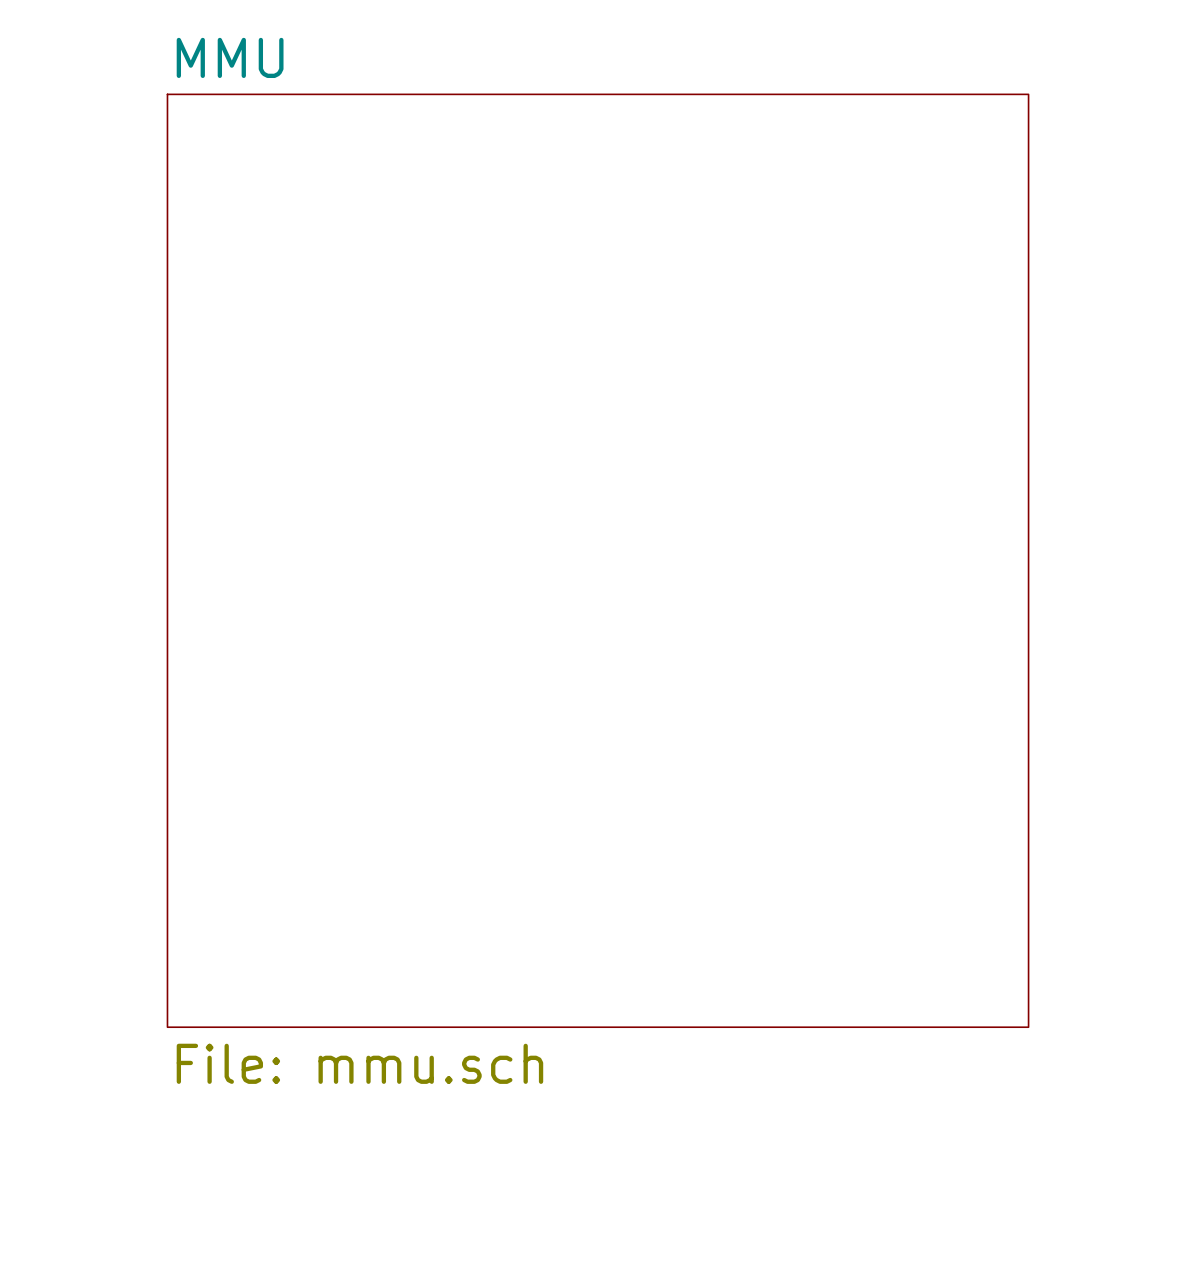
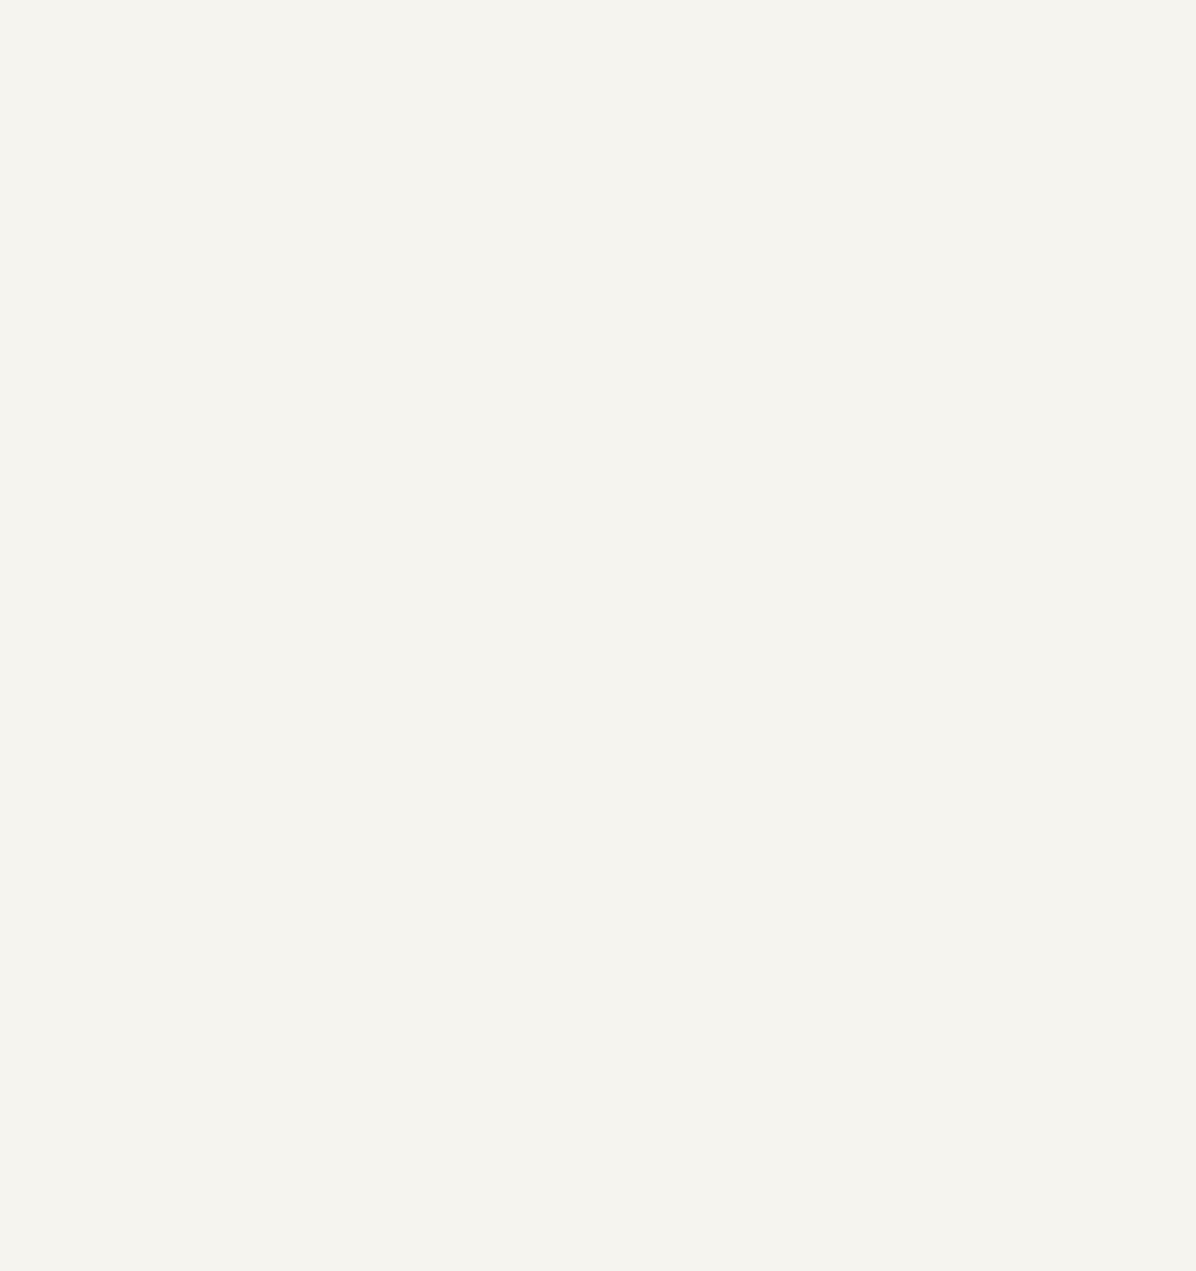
sheet MMU: File: mmu.sch (598, 560) -> none

